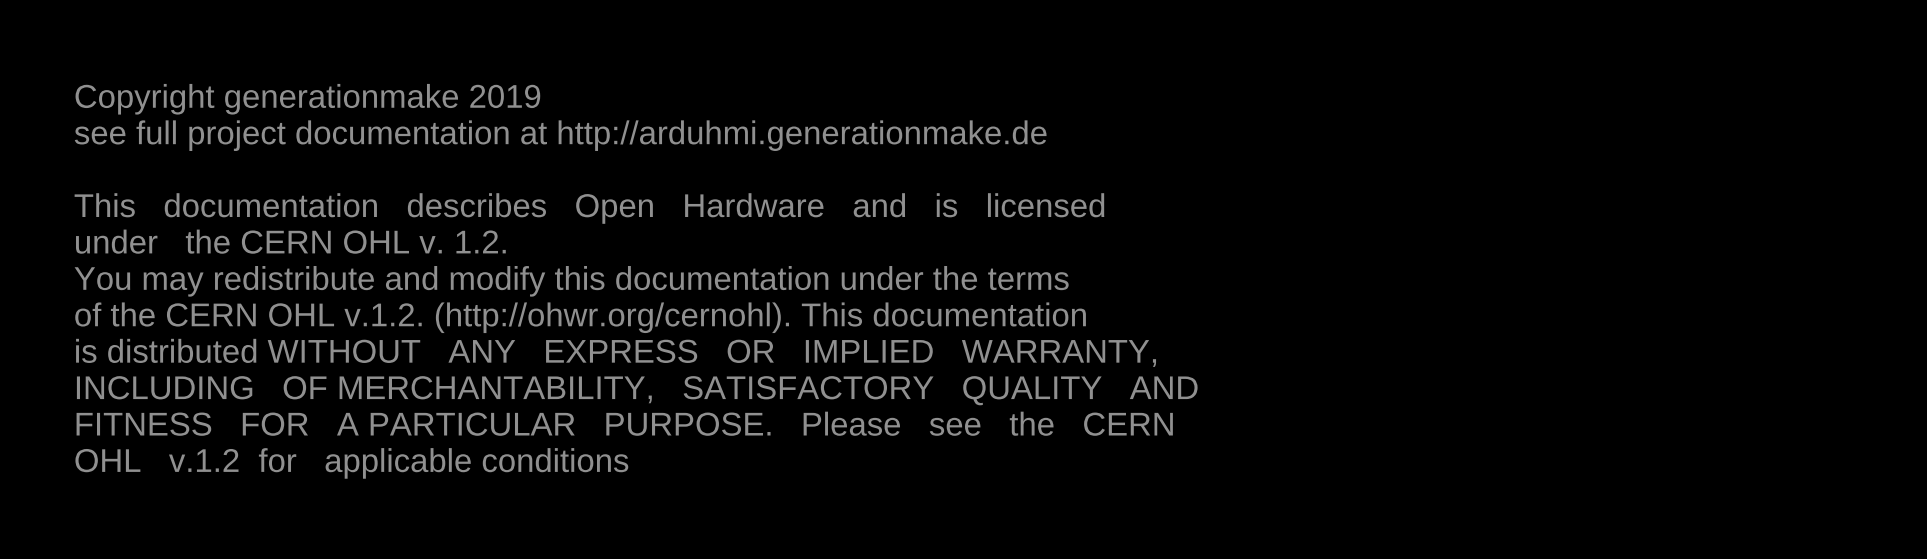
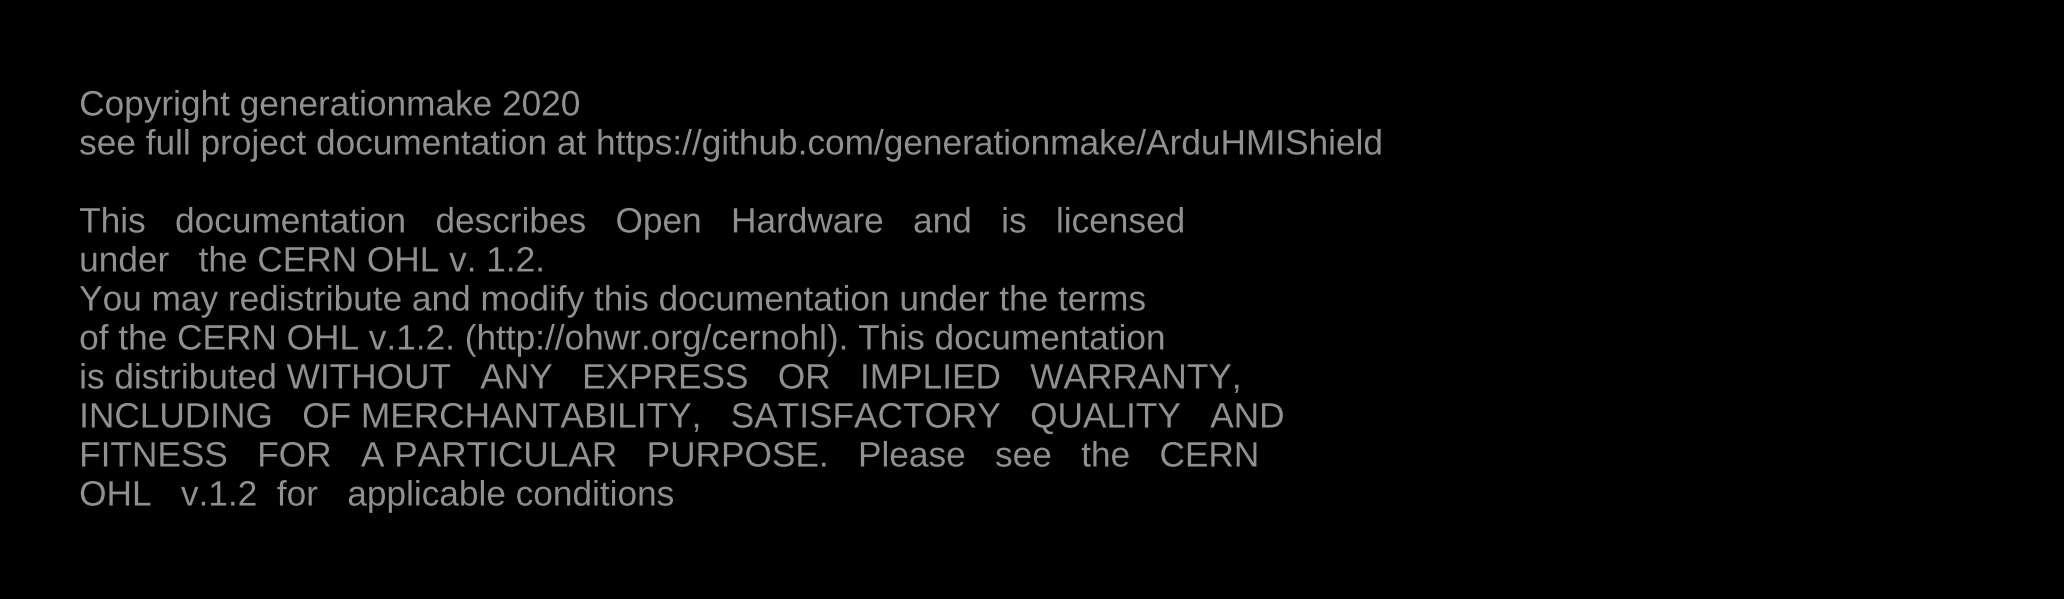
text: Copyright generationmake 2019 (307, 99) -> Copyright generationmake 2020 (329, 106)
text: see full project documentation at http://arduhmi.generationmake.de (560, 135) -> see full project documentation at https://github.com/generationmake/ArduHMIShield (730, 145)

